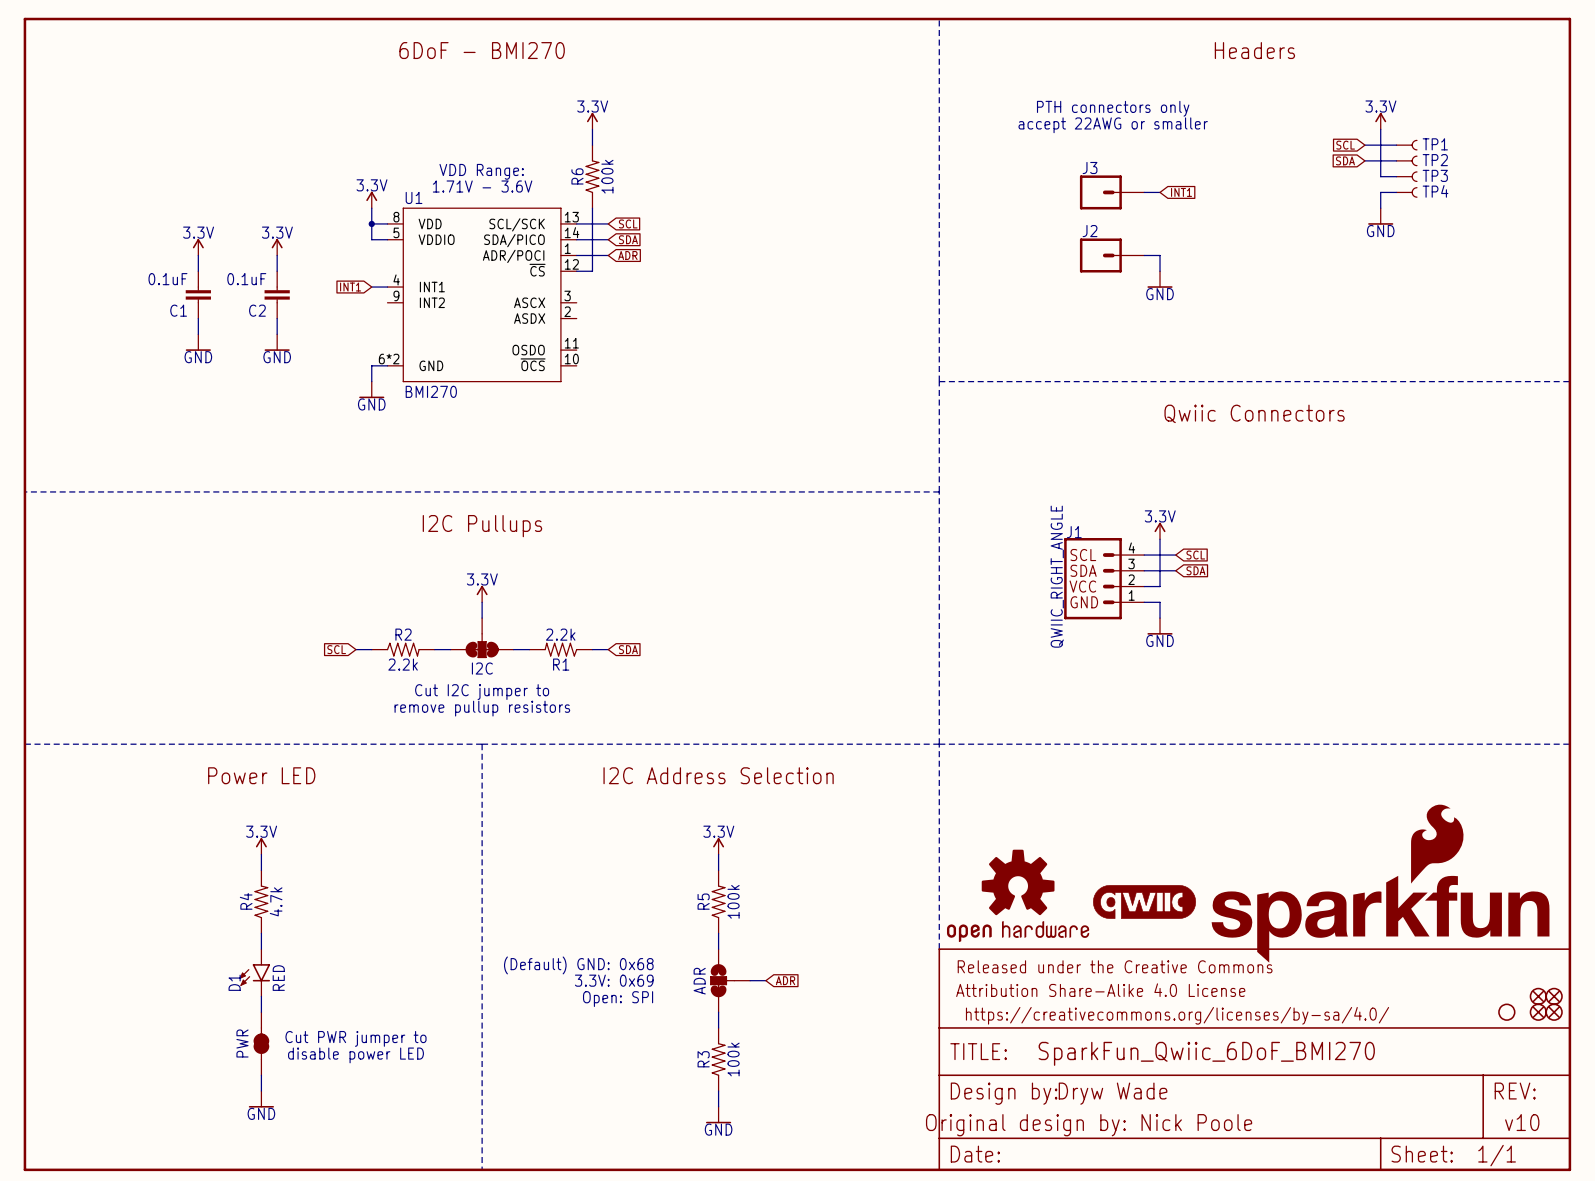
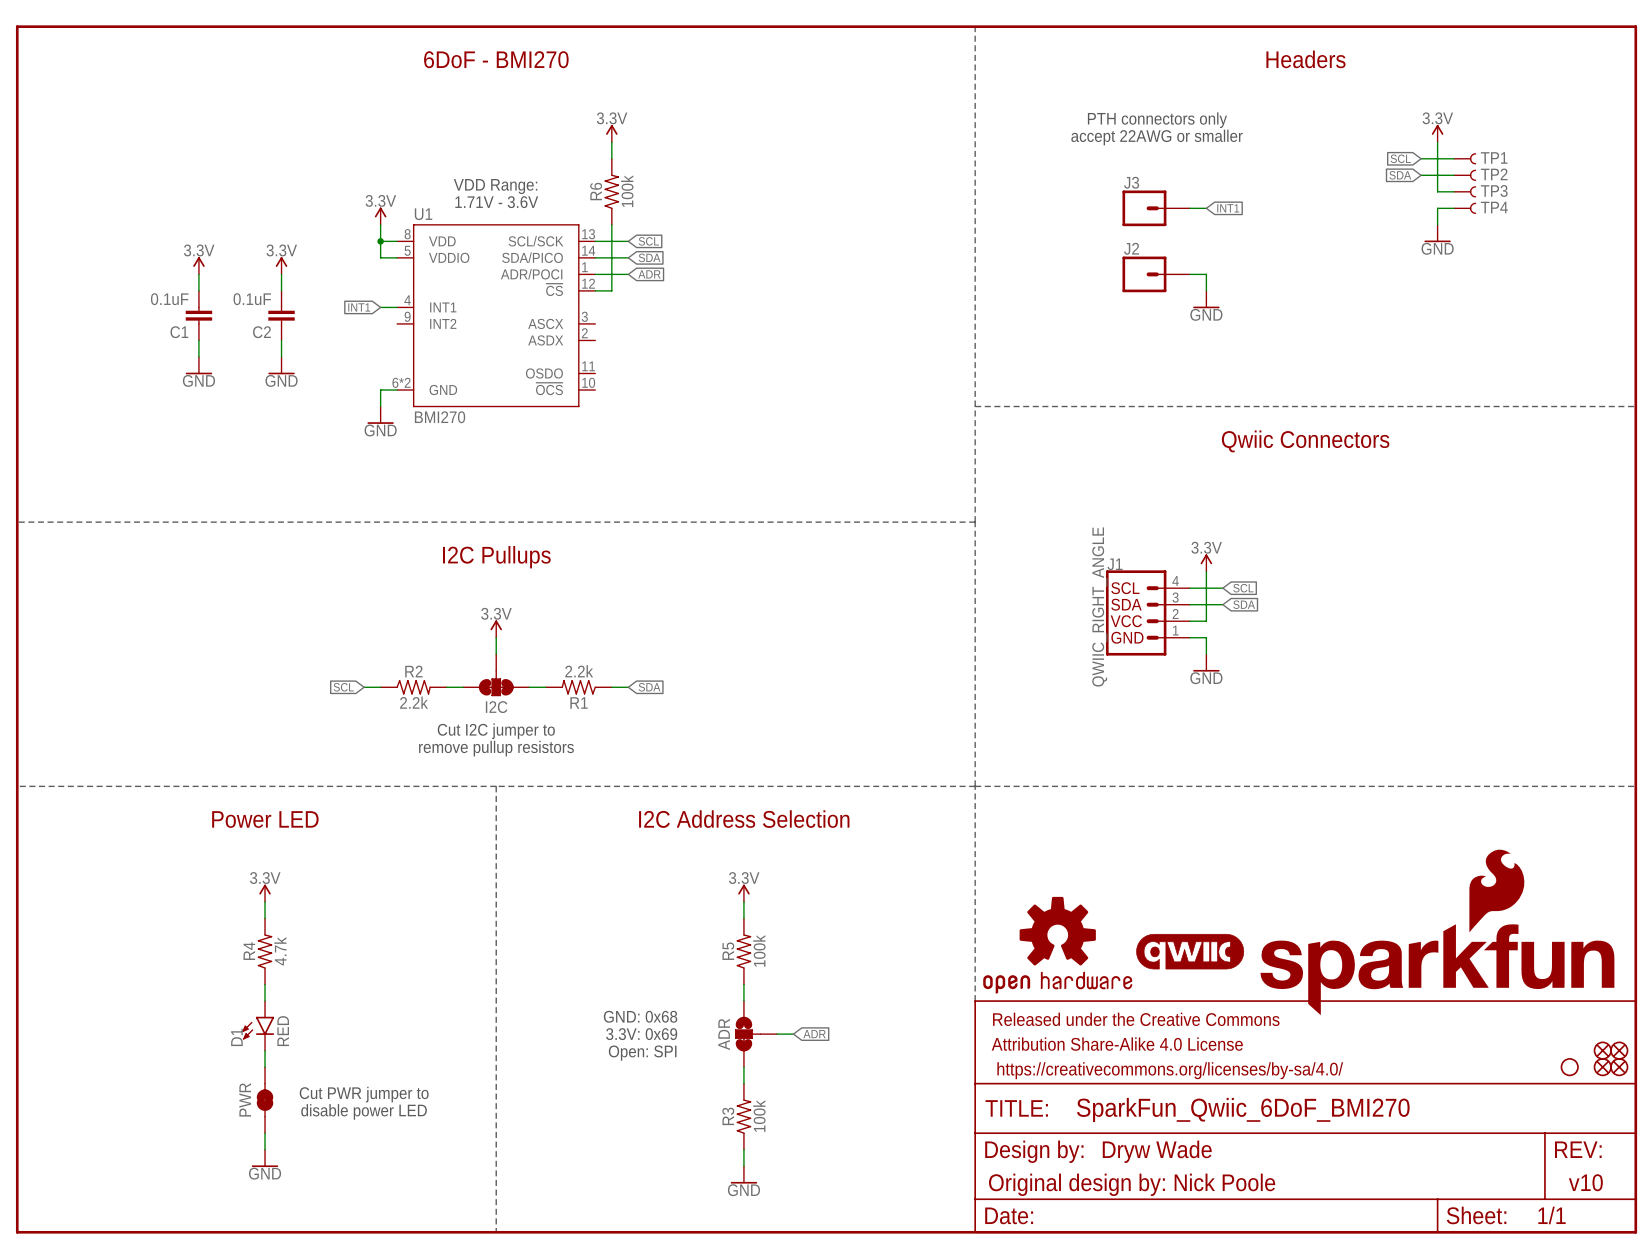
text: (Default) GND: 0x68 (578, 965) -> GND: 0x68 (640, 1016)

